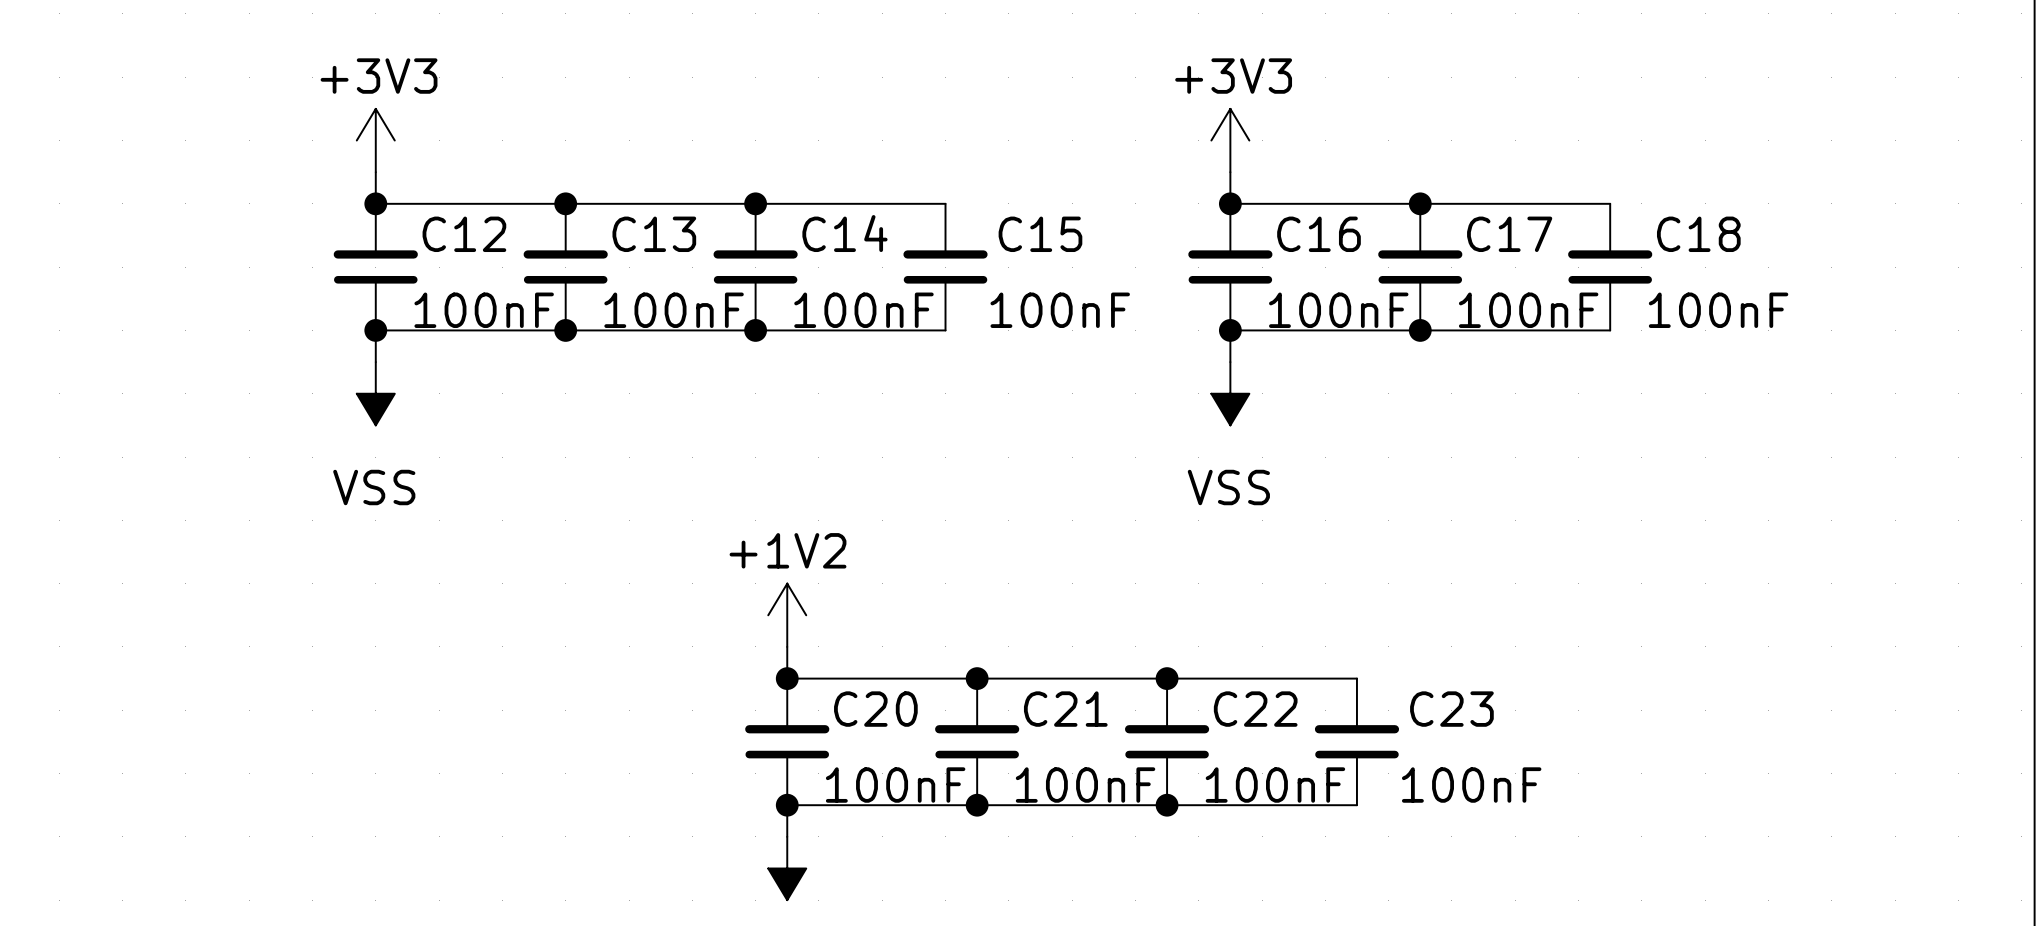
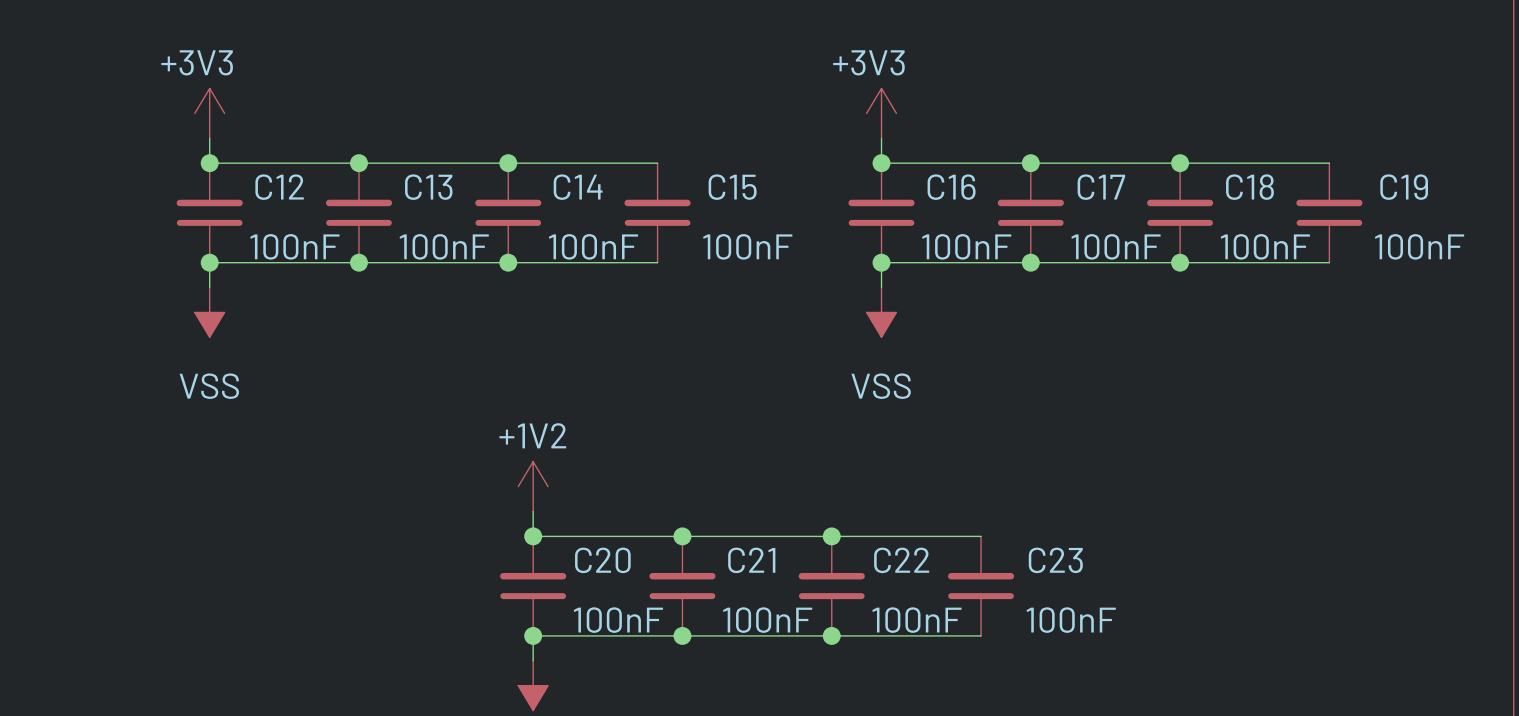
wire: none -> (1180, 163) (1329, 163)
junction: none -> (1180, 163)
C19: none -> 100nF (1329, 212)
wire: none -> (1180, 262) (1329, 262)
junction: none -> (1180, 262)

